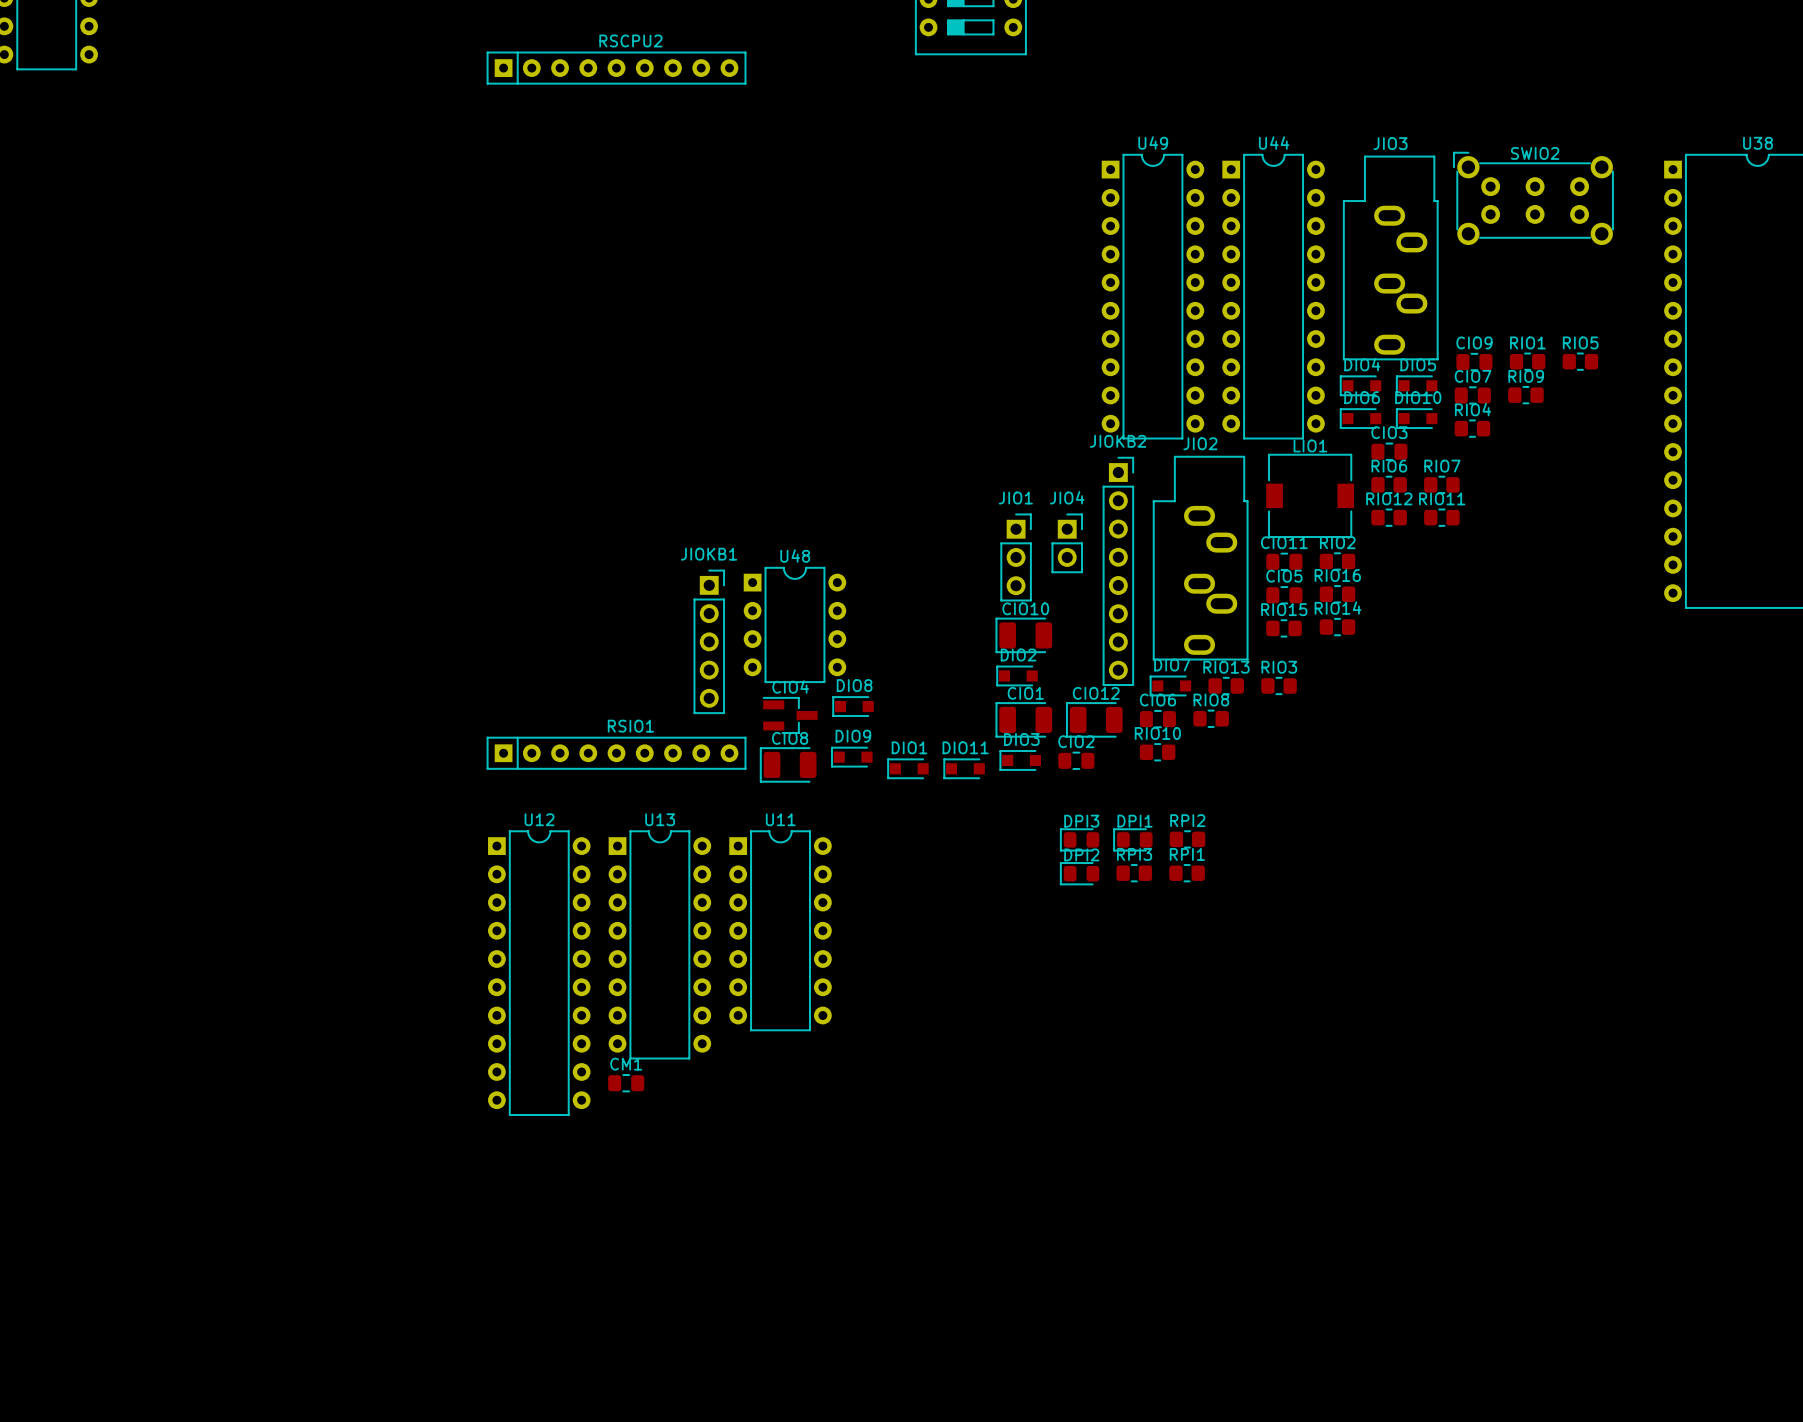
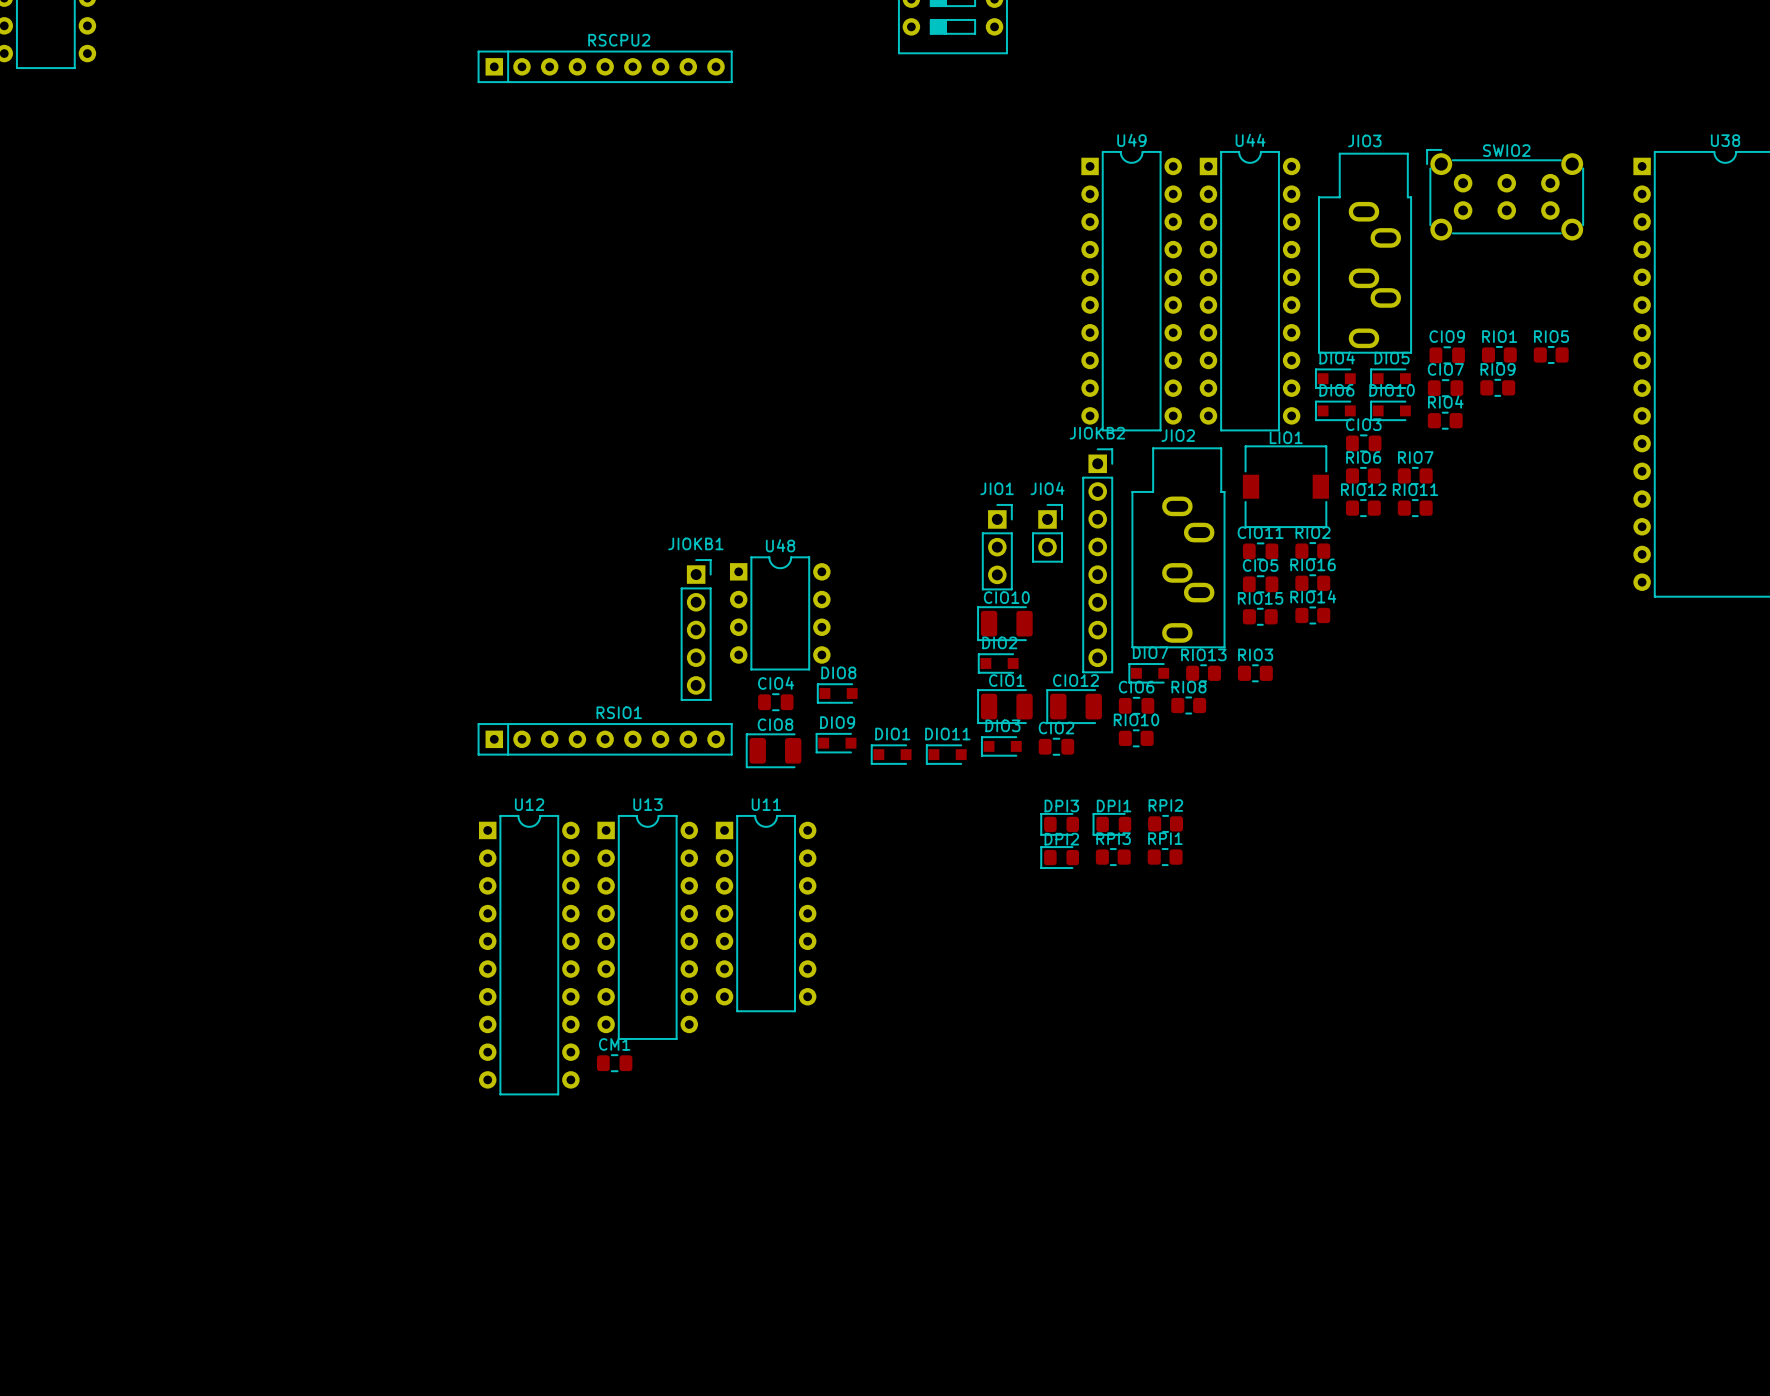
CIO4 footprint: [763, 697, 818, 734] -> [758, 693, 794, 711]

